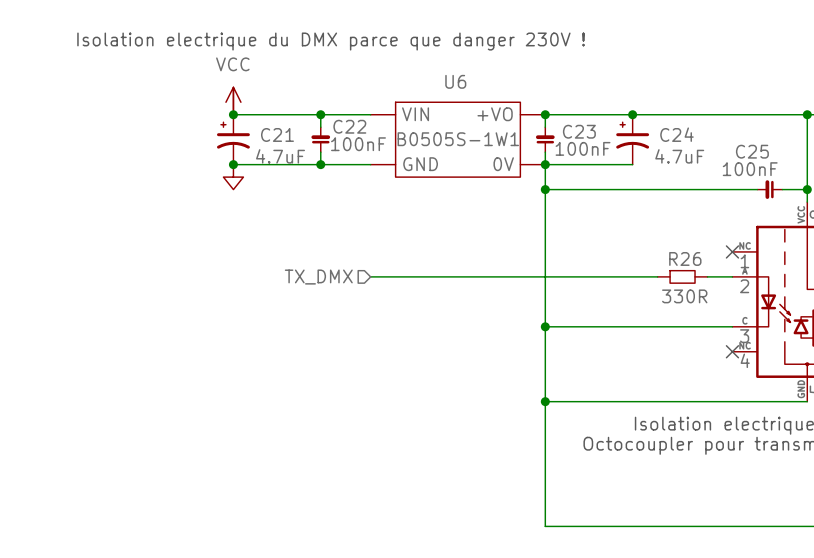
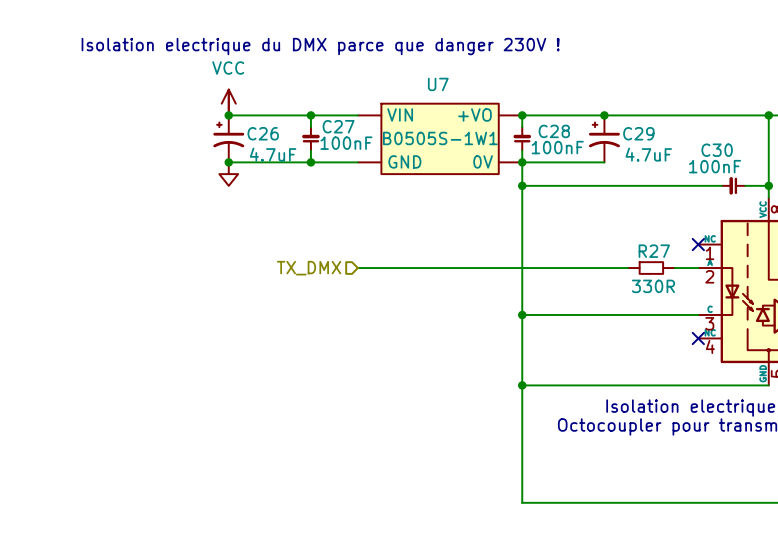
U6 name: U6 (455, 81) -> U7 (438, 84)
C22 name: C22 (349, 126) -> C27 (338, 126)
C23 name: C23 (579, 131) -> C28 (554, 131)
C21 name: C21 (277, 134) -> C26 (263, 133)
C24 name: C24 (676, 134) -> C29 (638, 133)
C25 name: C25 (752, 151) -> C30 (717, 150)
R26 name: R26 (685, 258) -> R27 (654, 251)

